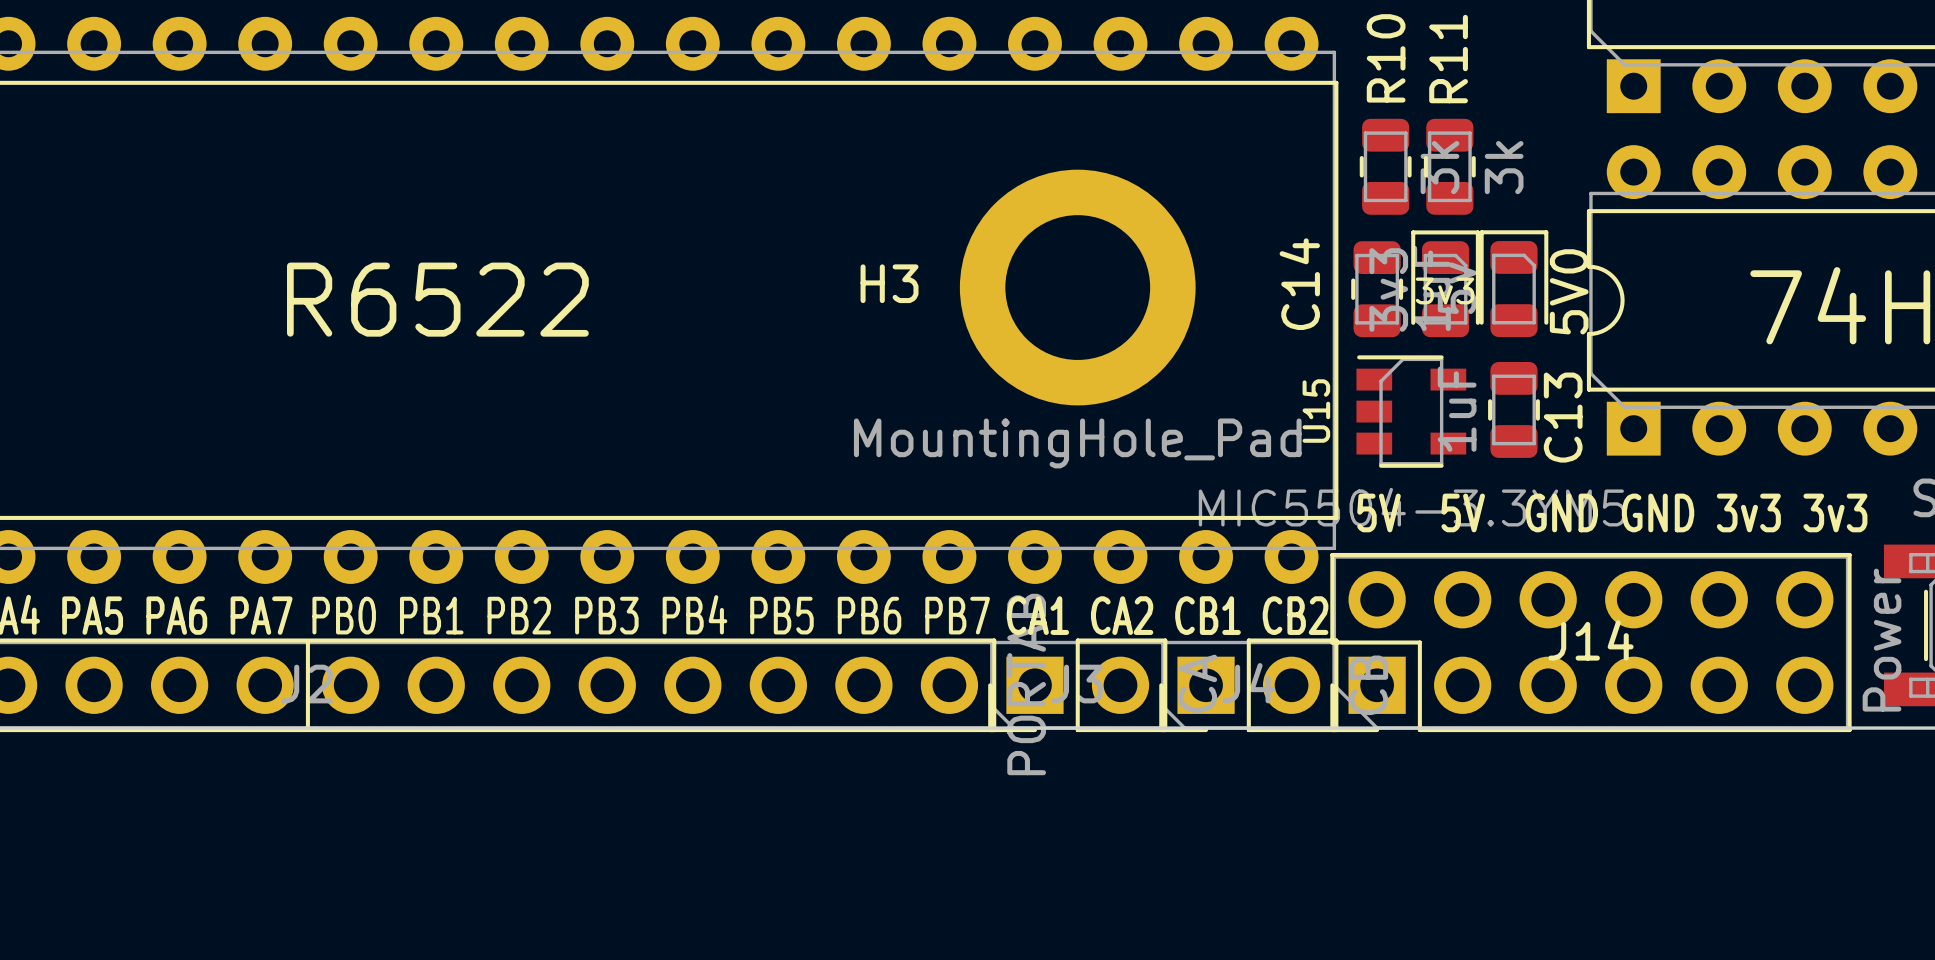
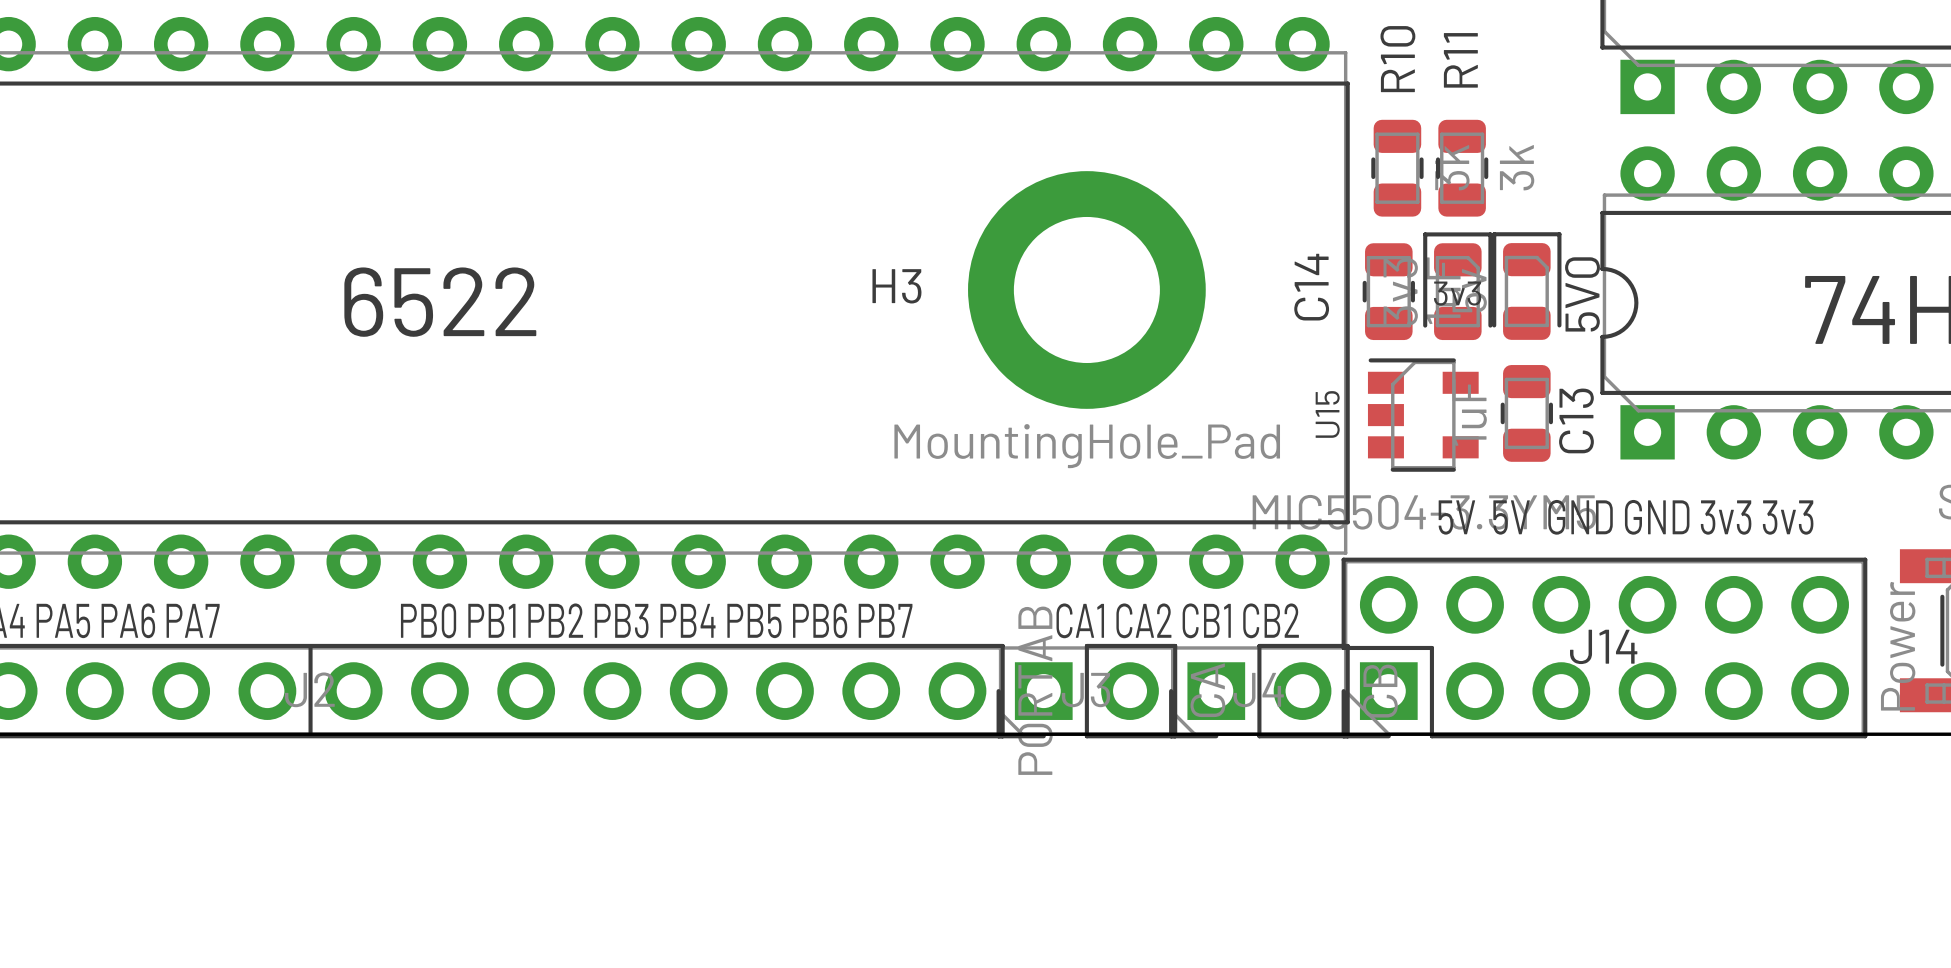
part value: R6522 (437, 299) -> 6522 (440, 302)

